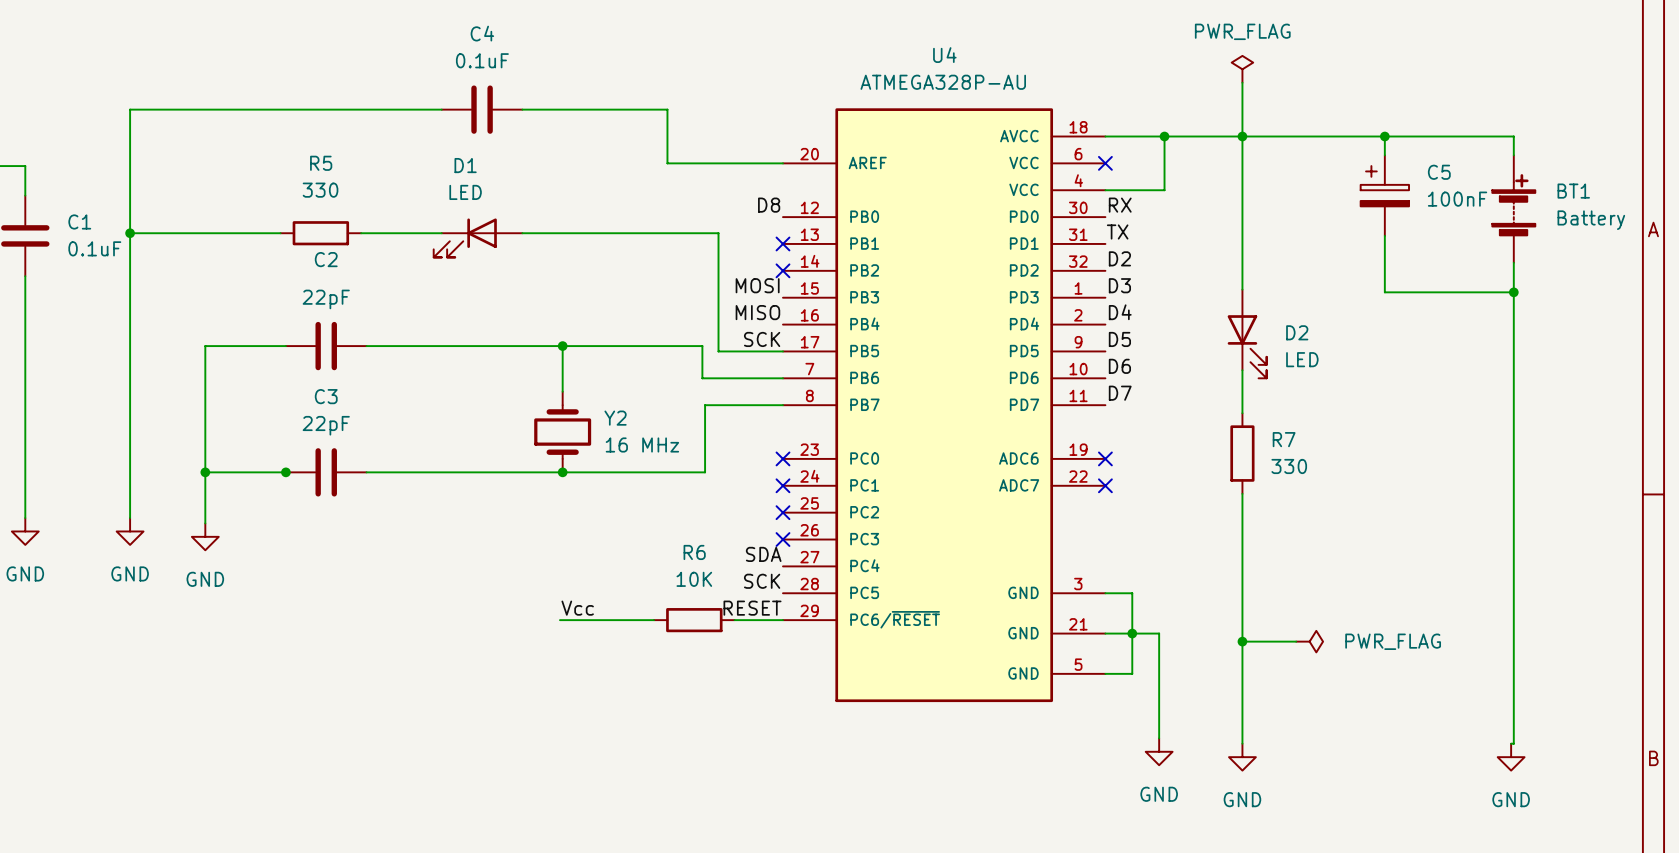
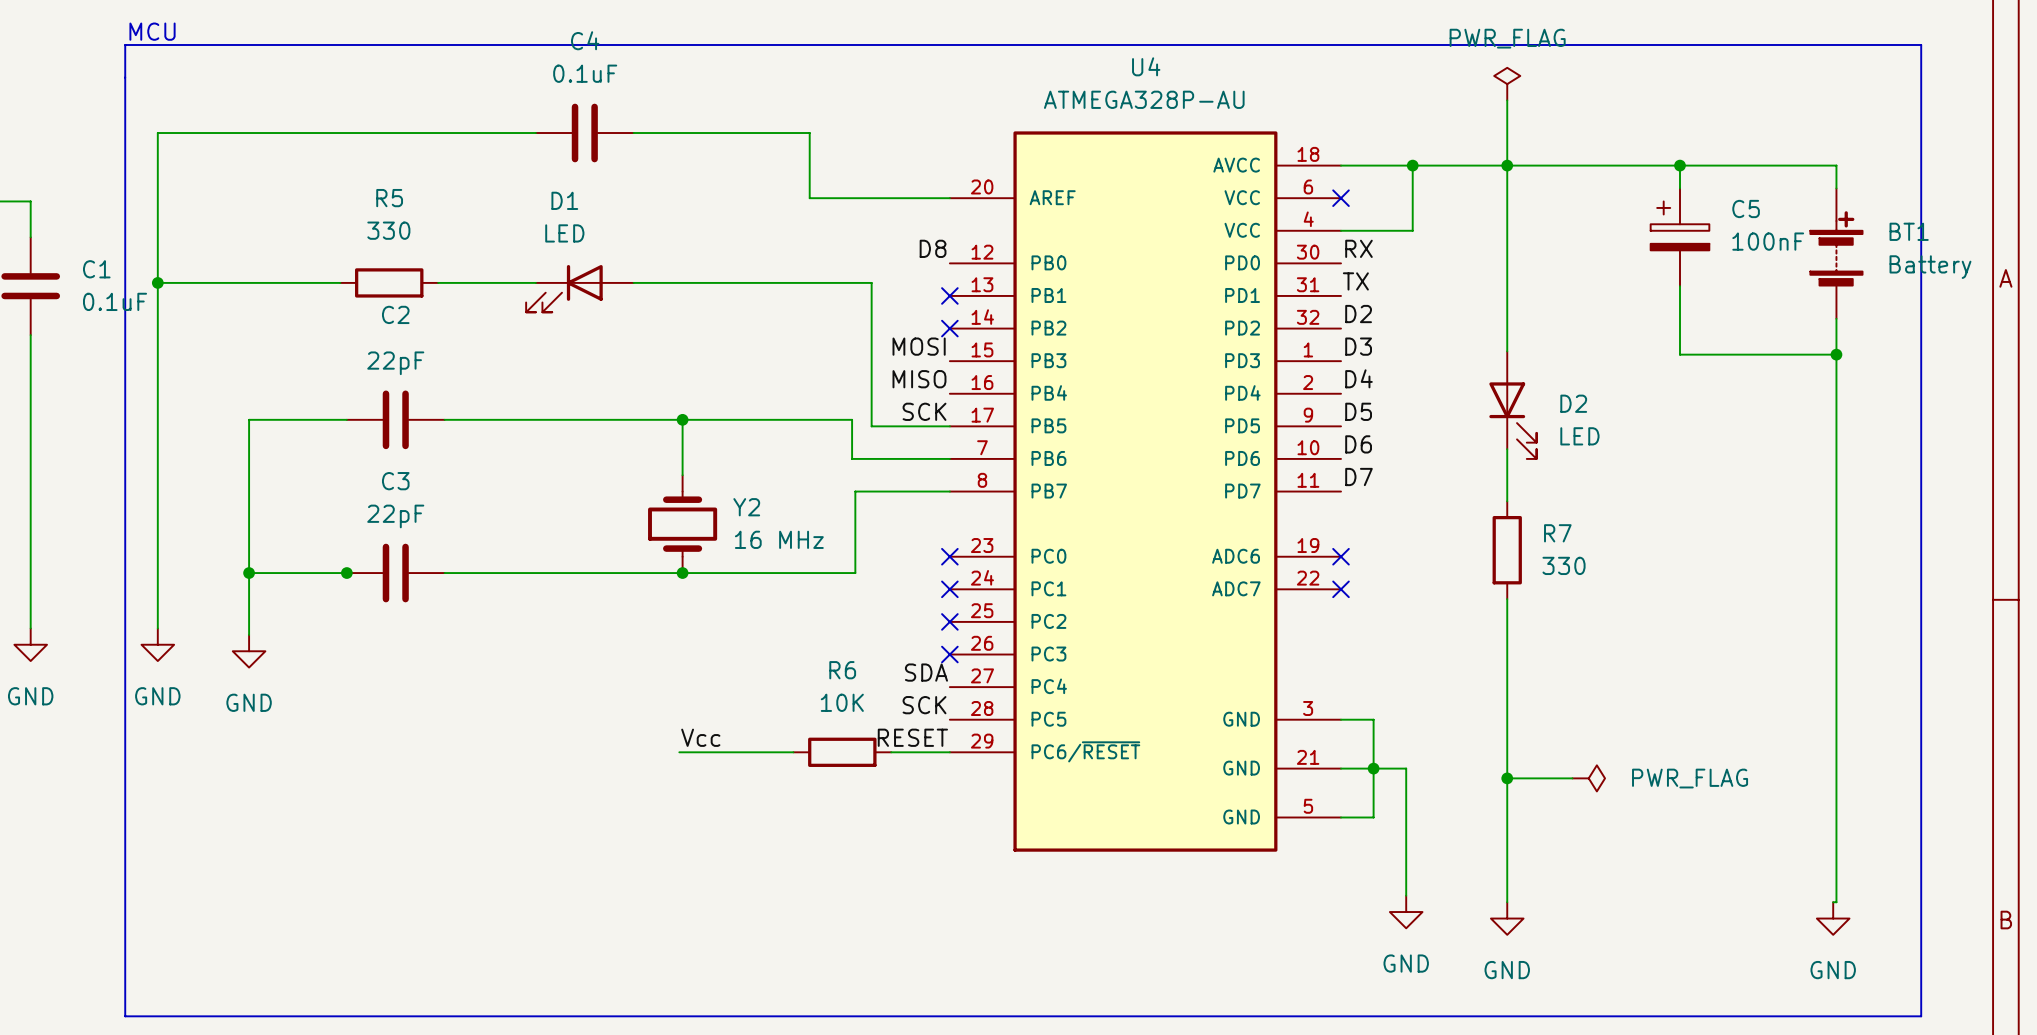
text: none -> MCU (152, 31)
line: none -> (125, 44) (1921, 44) (1921, 1016) (125, 1016) (125, 44)

